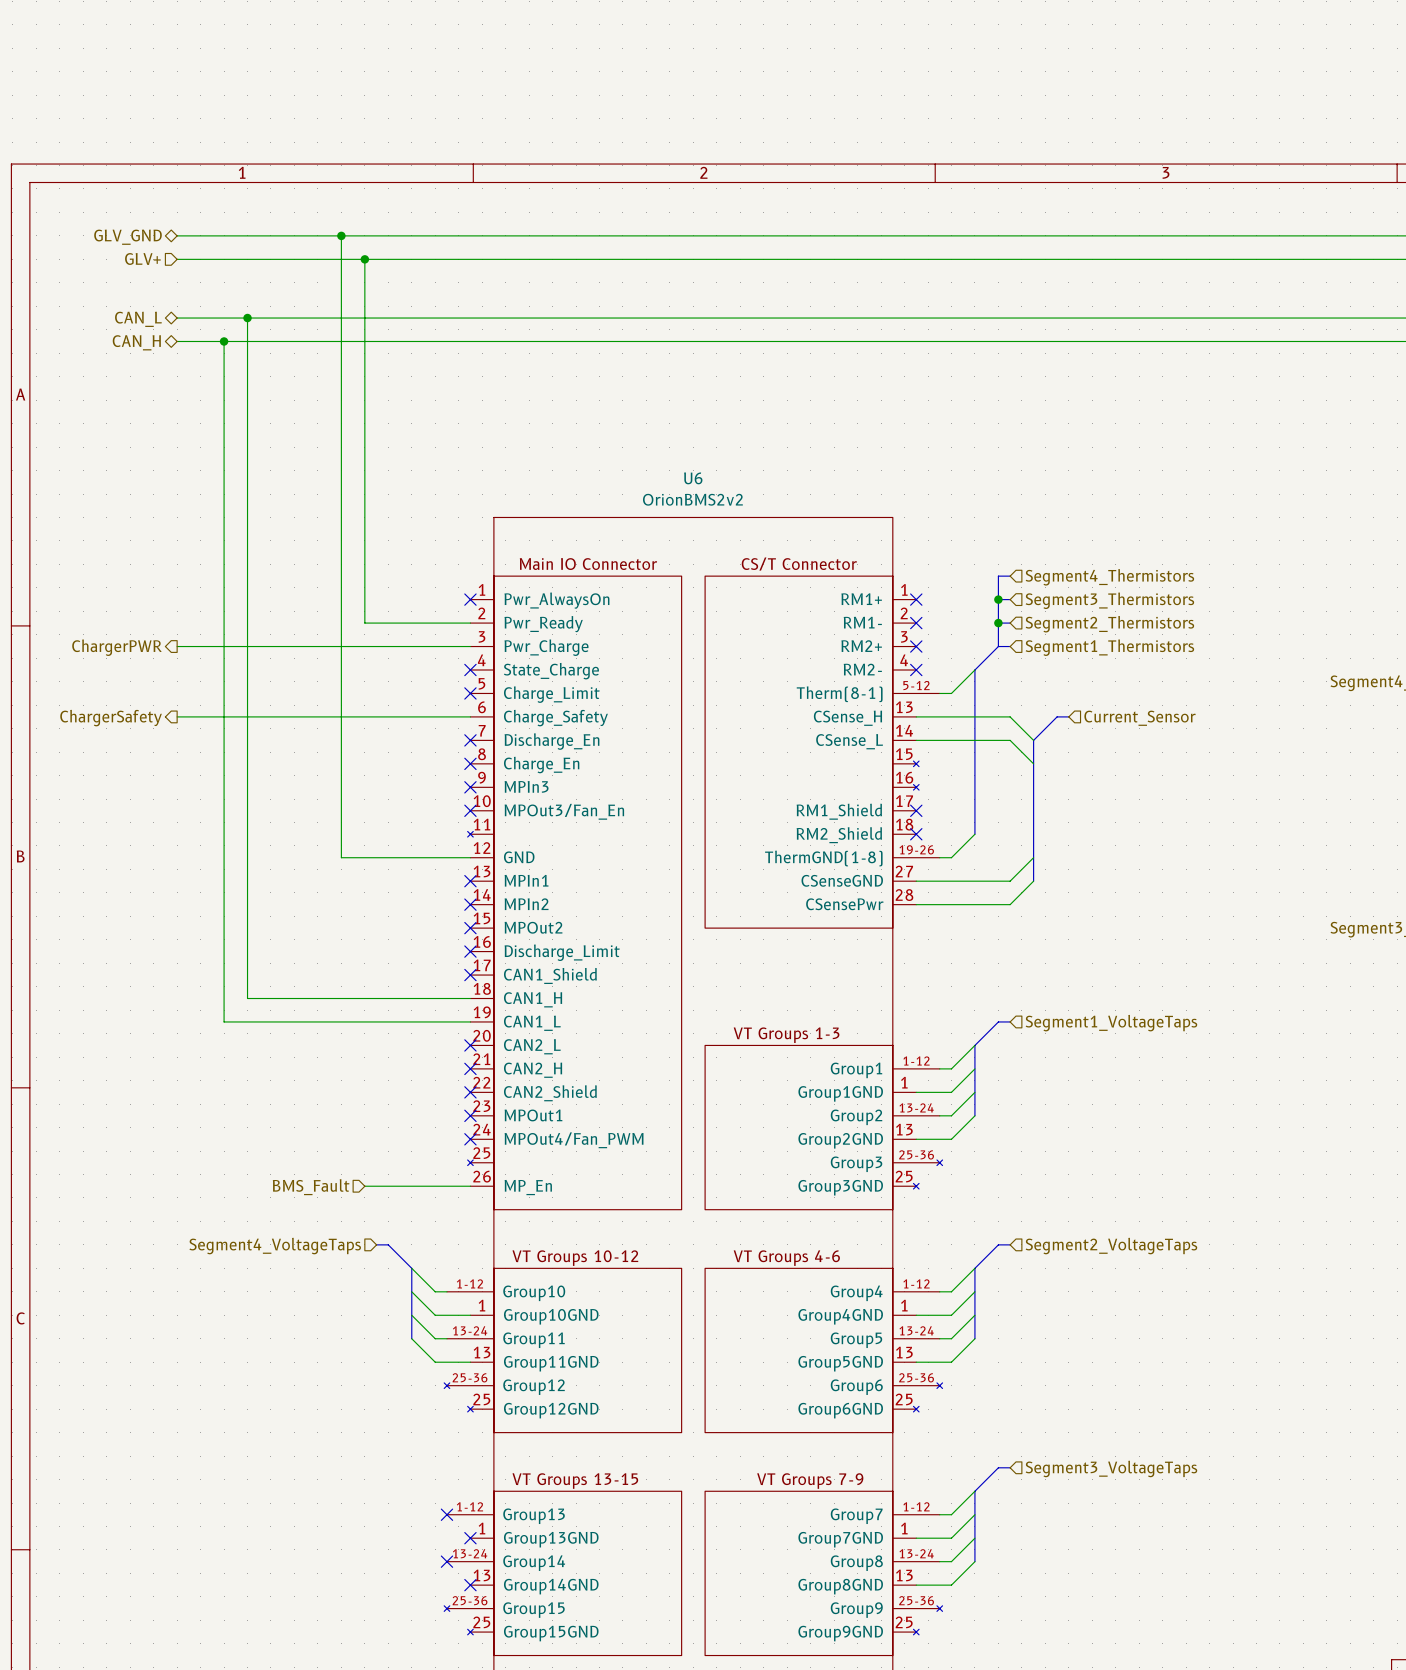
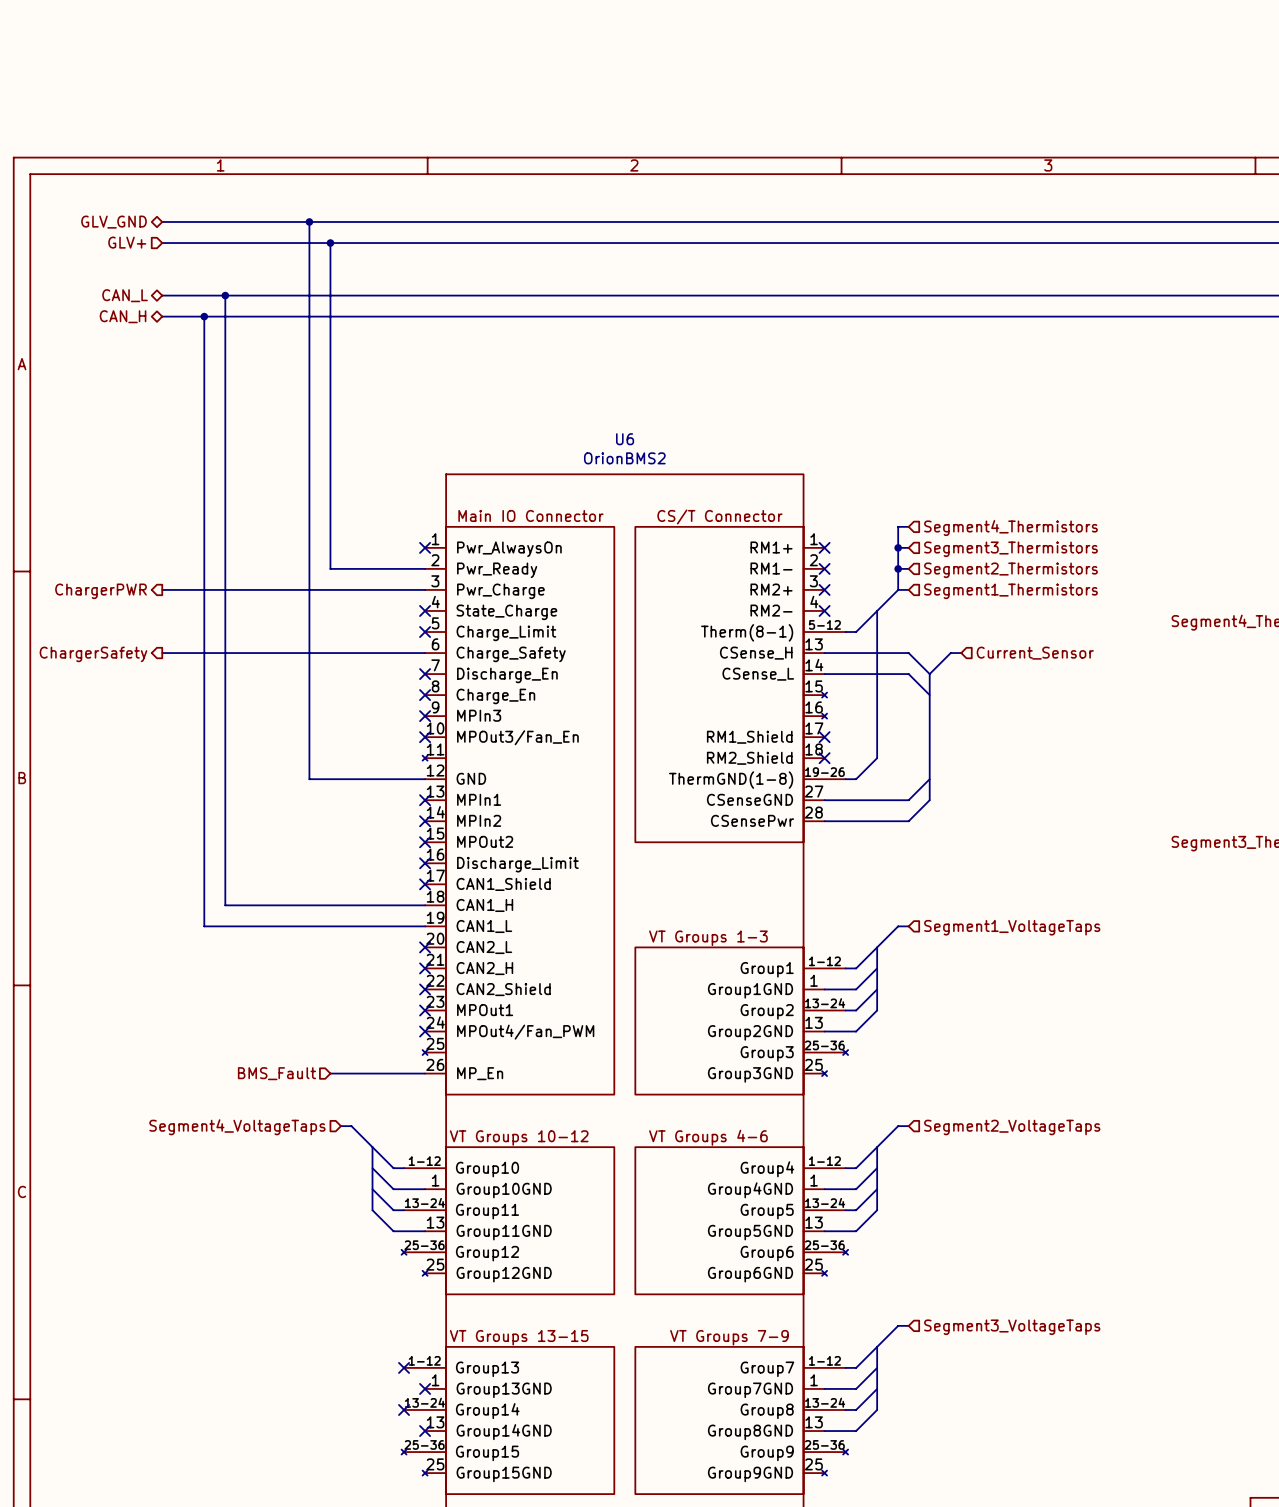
U6 value: OrionBMS2v2 (692, 499) -> OrionBMS2 (624, 458)

